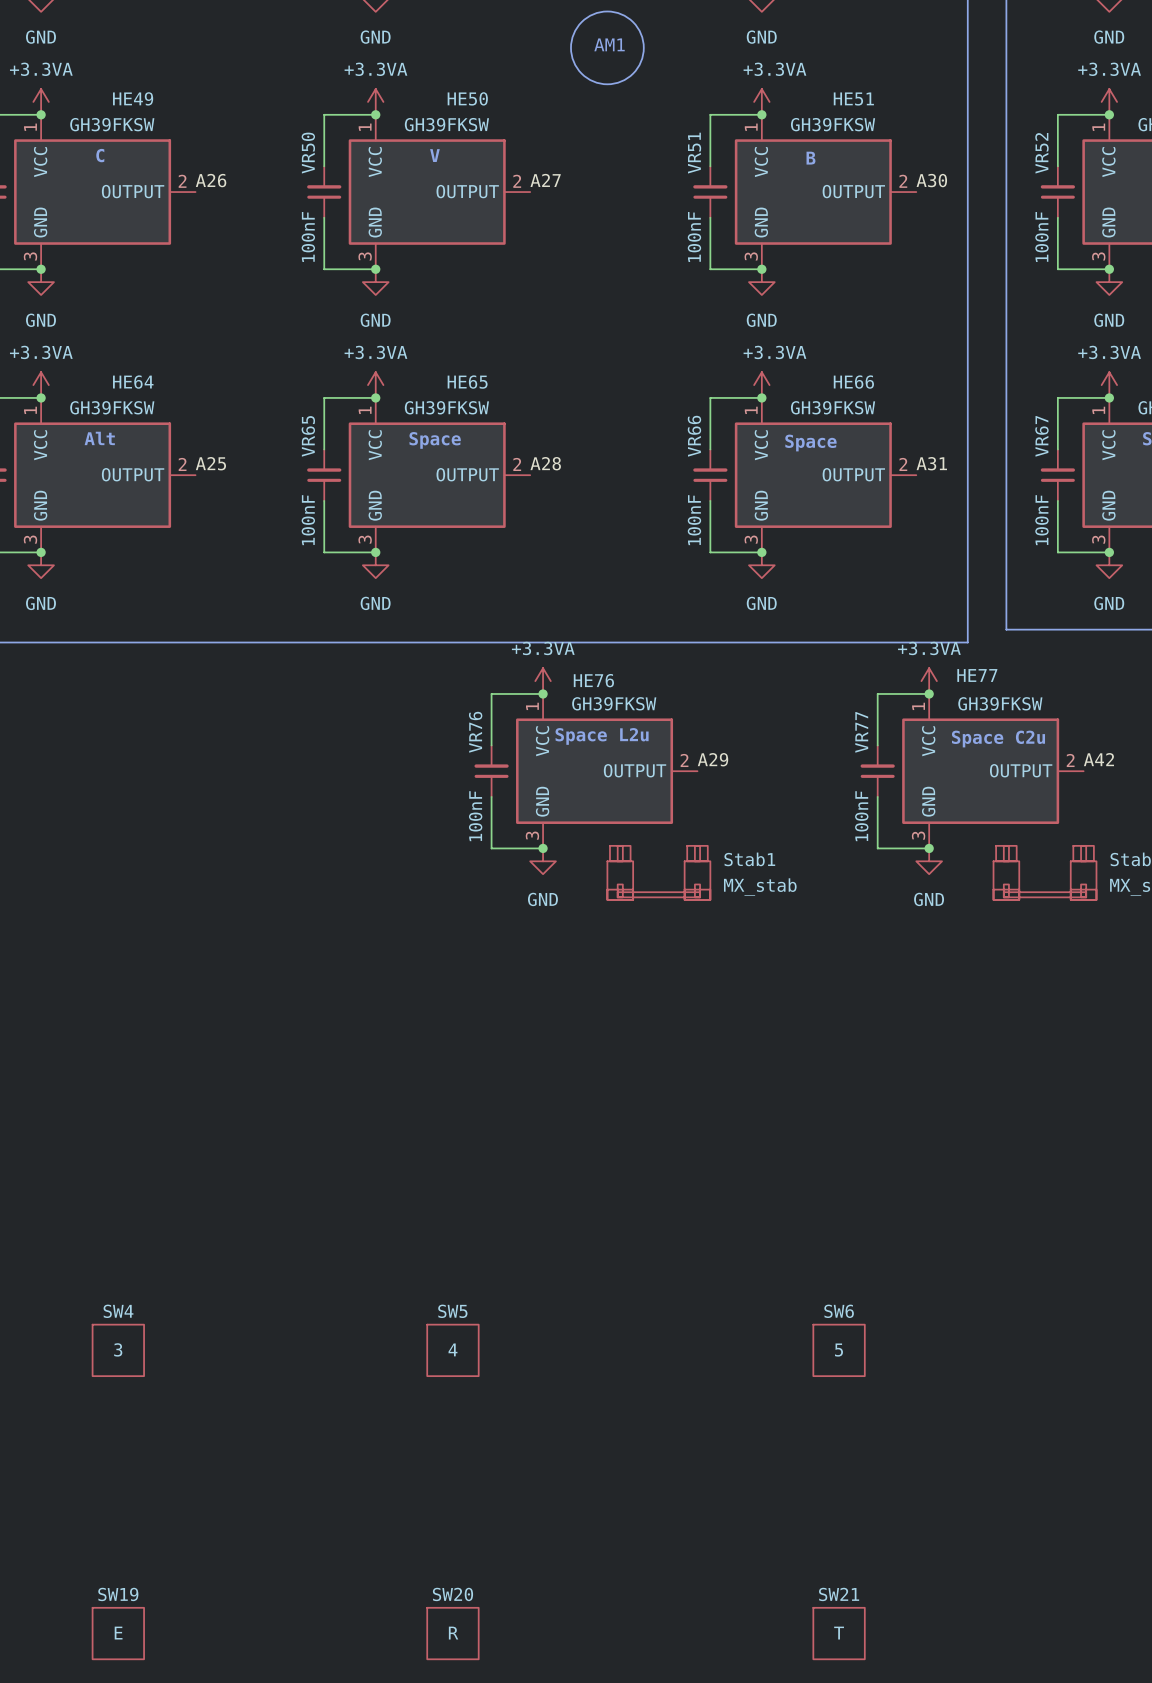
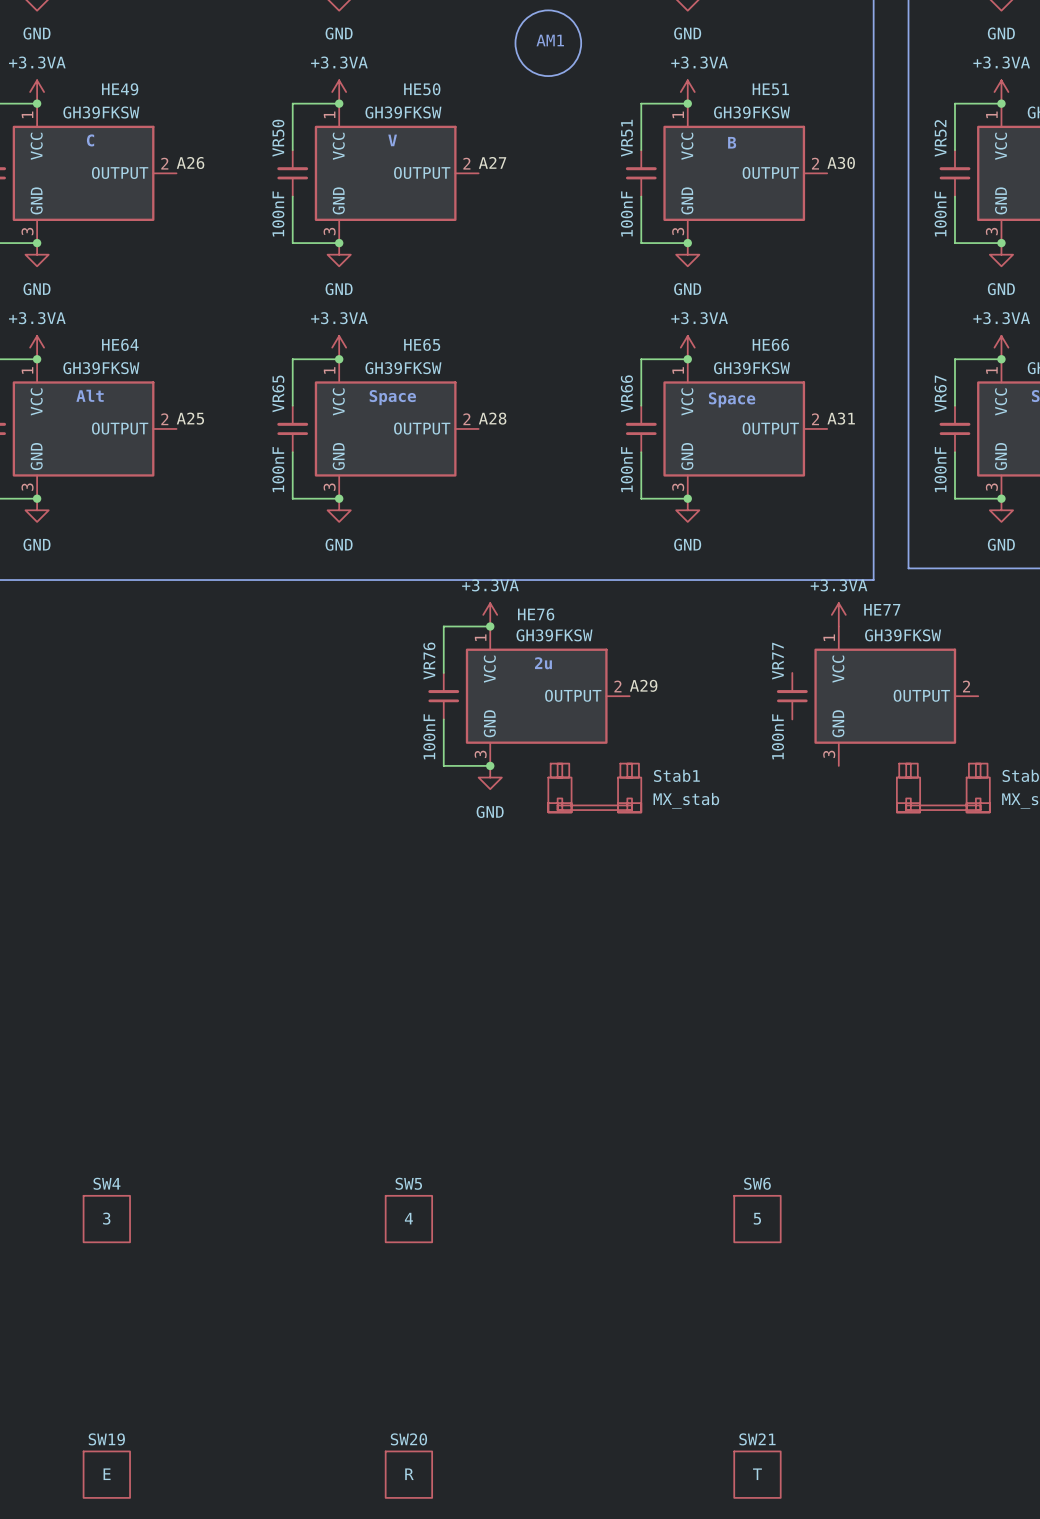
wire: (929, 693) (877, 693) (877, 745) -> none
junction: (929, 693) -> none
text: Space L2u (602, 736) -> 2u (543, 663)
text: Space C2u (998, 739) -> none
label: A42 (1098, 759) -> none
wire: (877, 796) (877, 848) (929, 848) -> none
junction: (929, 848) -> none
power symbol: GND (929, 861) -> none

